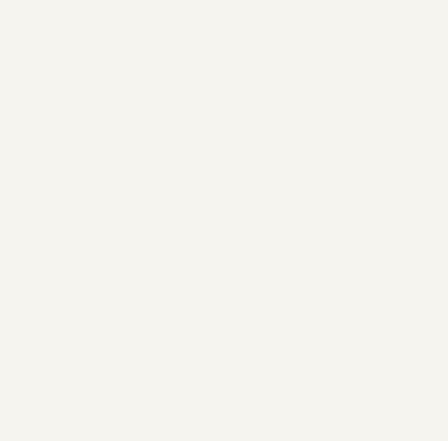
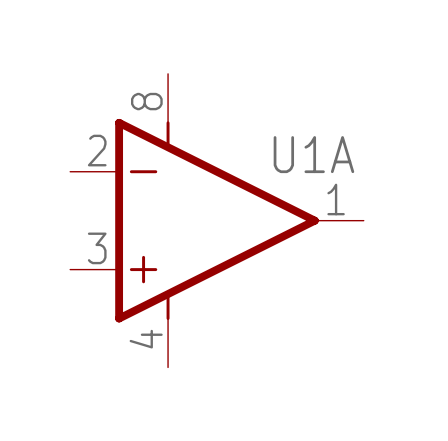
U1A: none -> (216, 220)

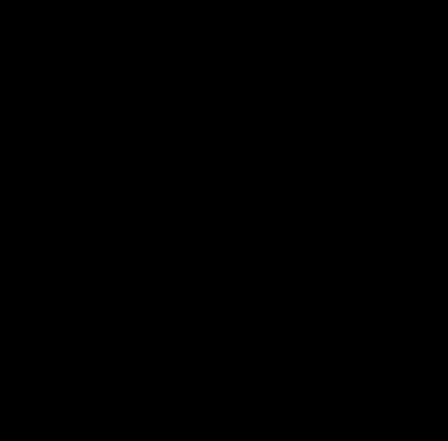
U1A: (216, 220) -> none

